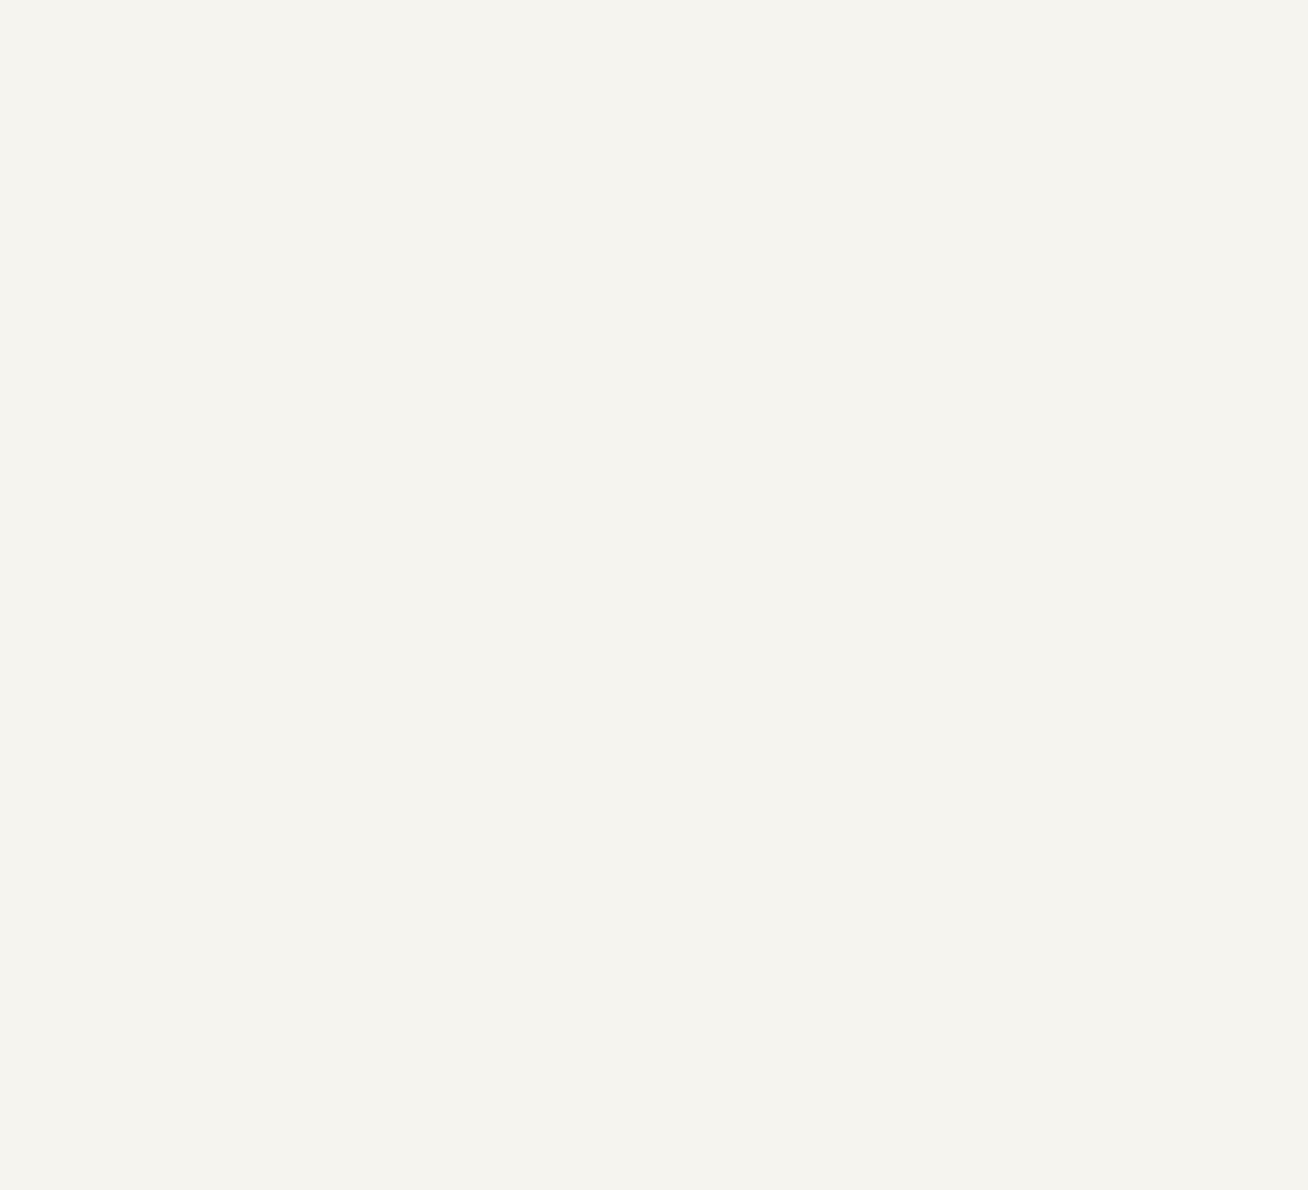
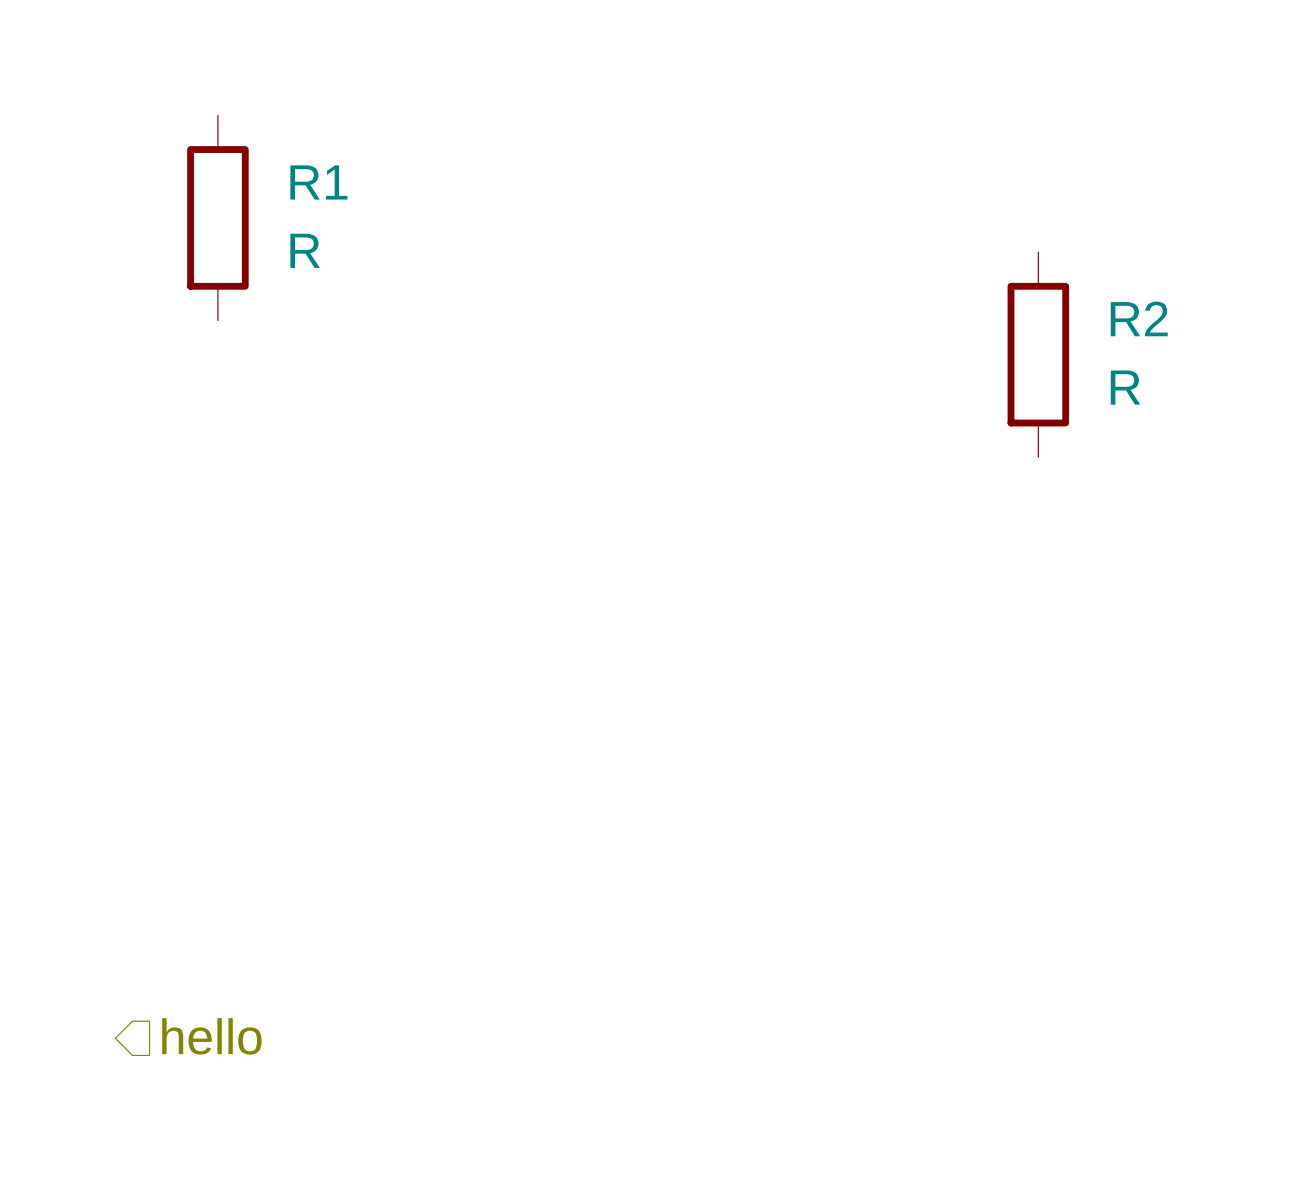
R1: none -> R (217, 217)
R2: none -> R (1038, 354)
hierarchical label: none -> hello (211, 1036)

